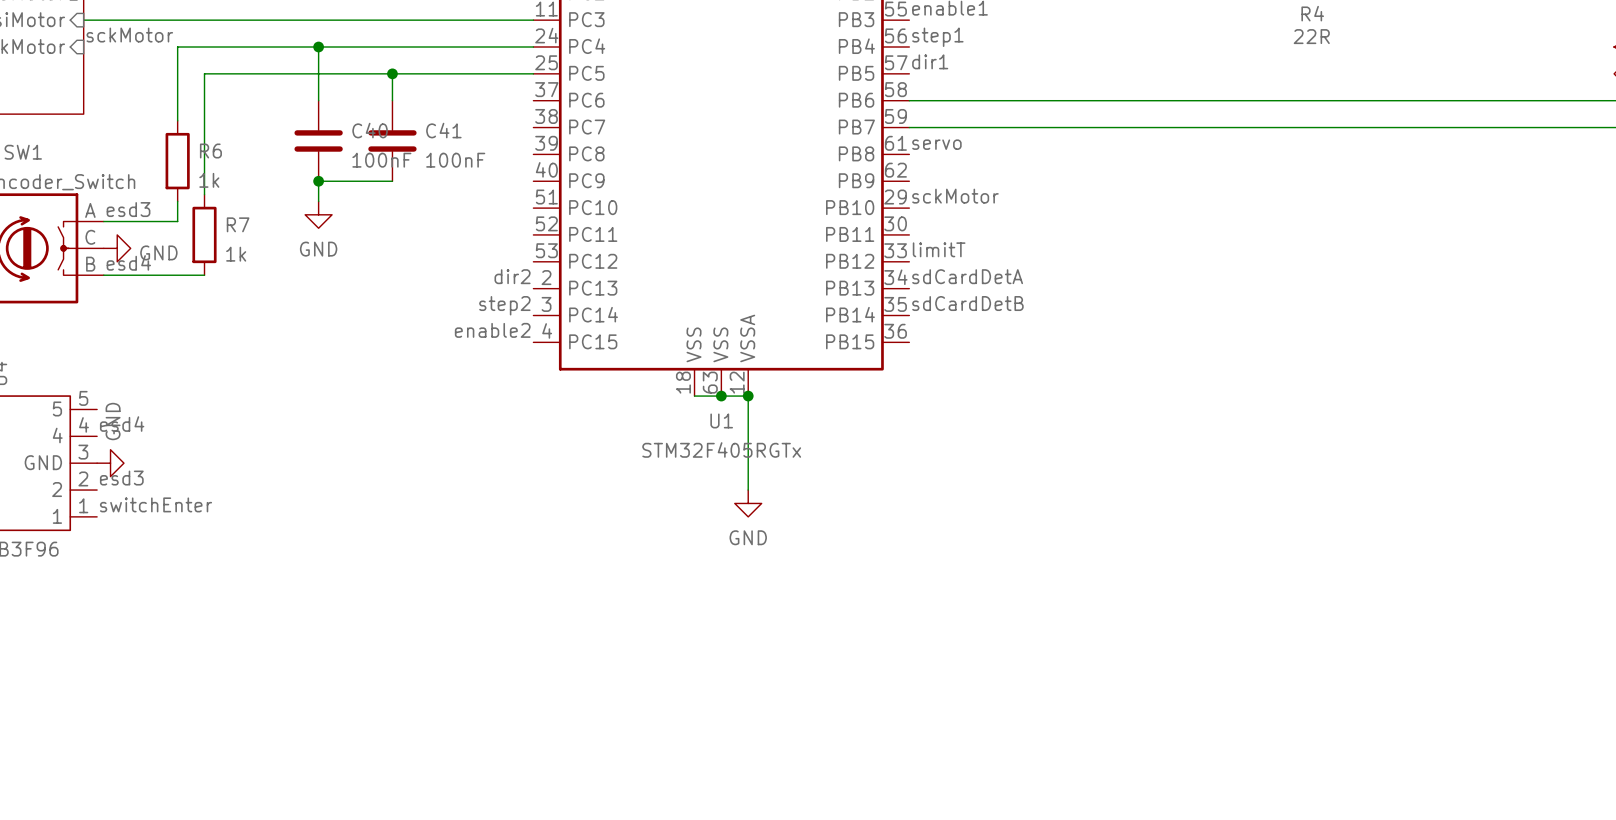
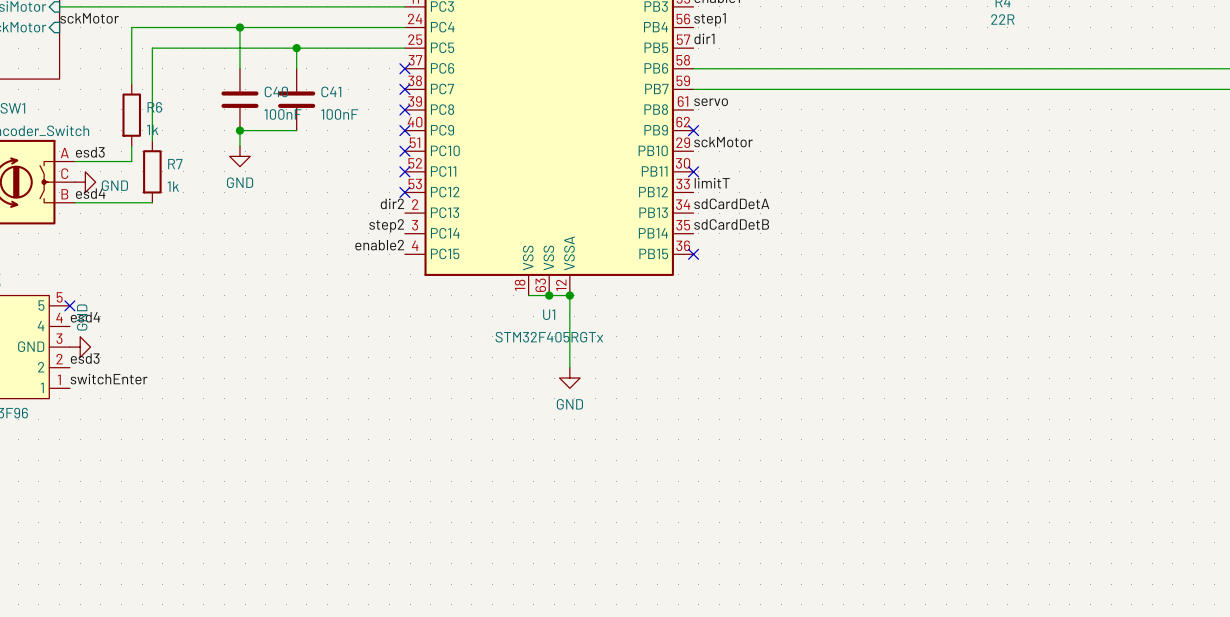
no-connect mark: none -> (404, 68)
no-connect mark: none -> (404, 89)
no-connect mark: none -> (404, 109)
no-connect mark: none -> (404, 130)
no-connect mark: none -> (693, 130)
no-connect mark: none -> (404, 151)
no-connect mark: none -> (404, 171)
no-connect mark: none -> (693, 171)
no-connect mark: none -> (404, 192)
no-connect mark: none -> (693, 254)
no-connect mark: none -> (69, 305)

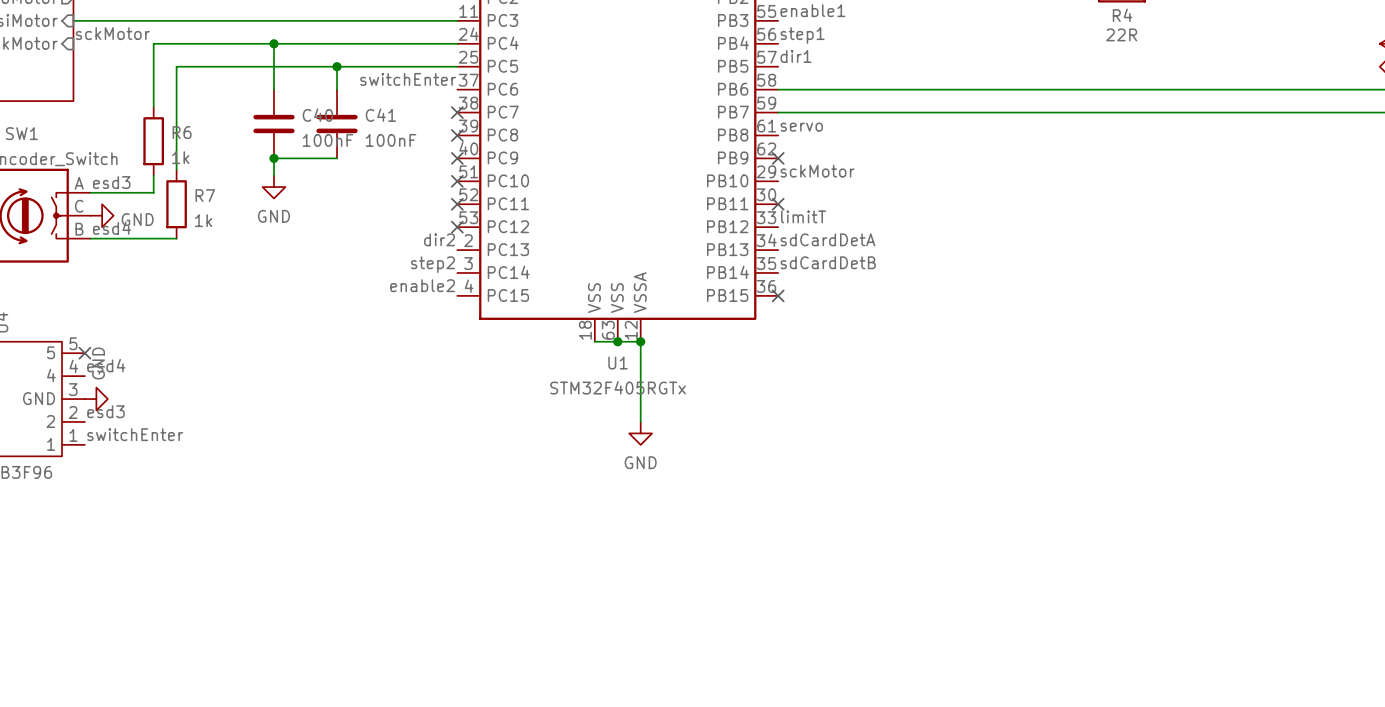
label: none -> switchEnter (408, 79)
no-connect mark: (404, 68) -> none

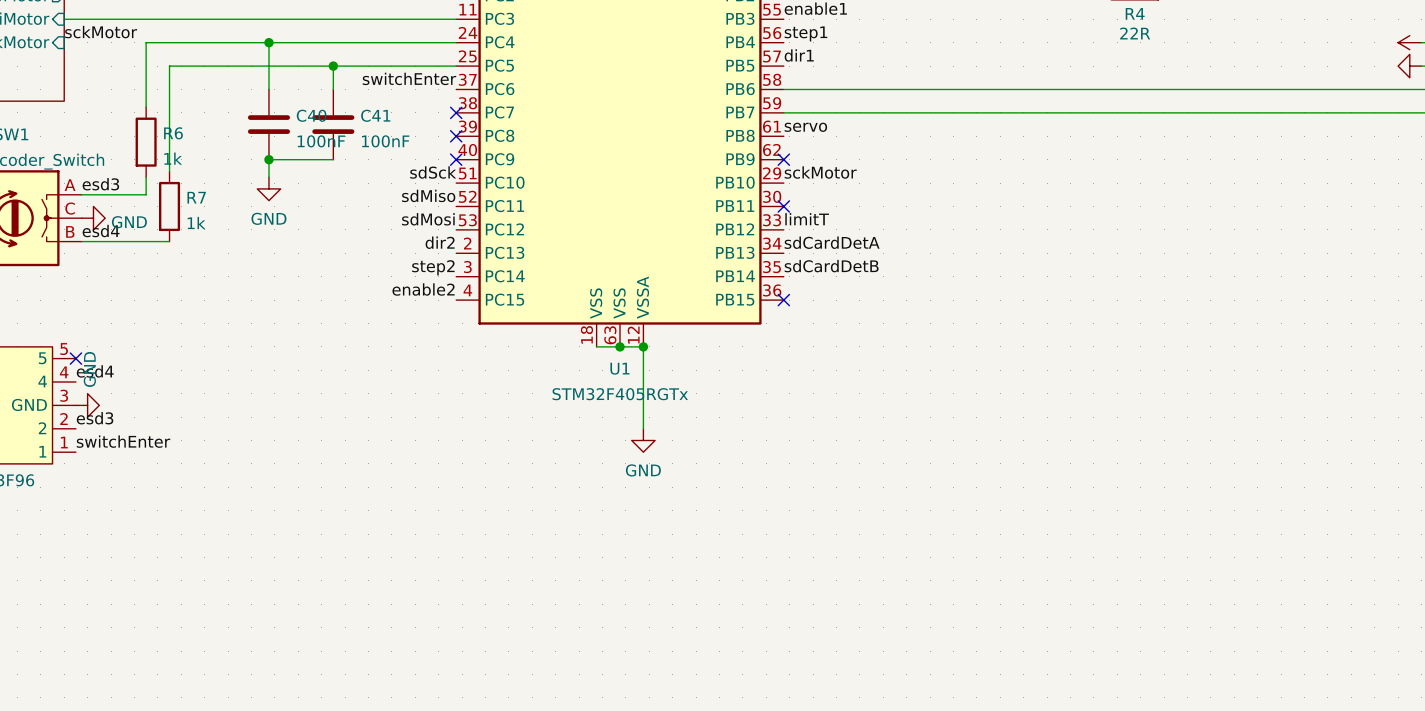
label: none -> sdSck (433, 172)
no-connect mark: (457, 181) -> none
label: none -> sdMiso (428, 195)
no-connect mark: (457, 204) -> none
label: none -> sdMosi (428, 219)
no-connect mark: (457, 227) -> none

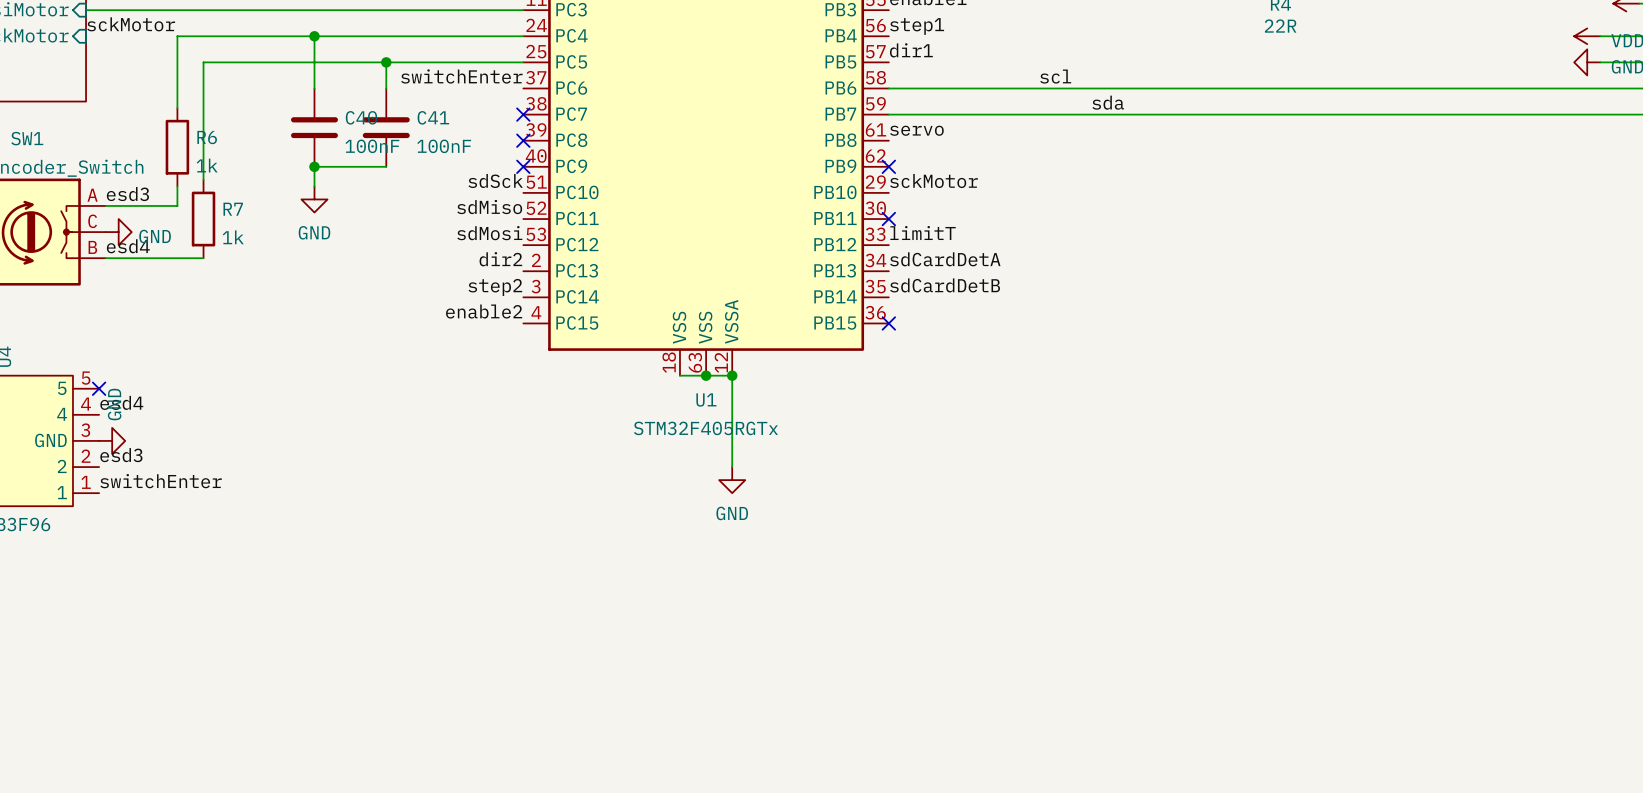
label: none -> scl (1055, 76)
label: none -> sda (1108, 102)

